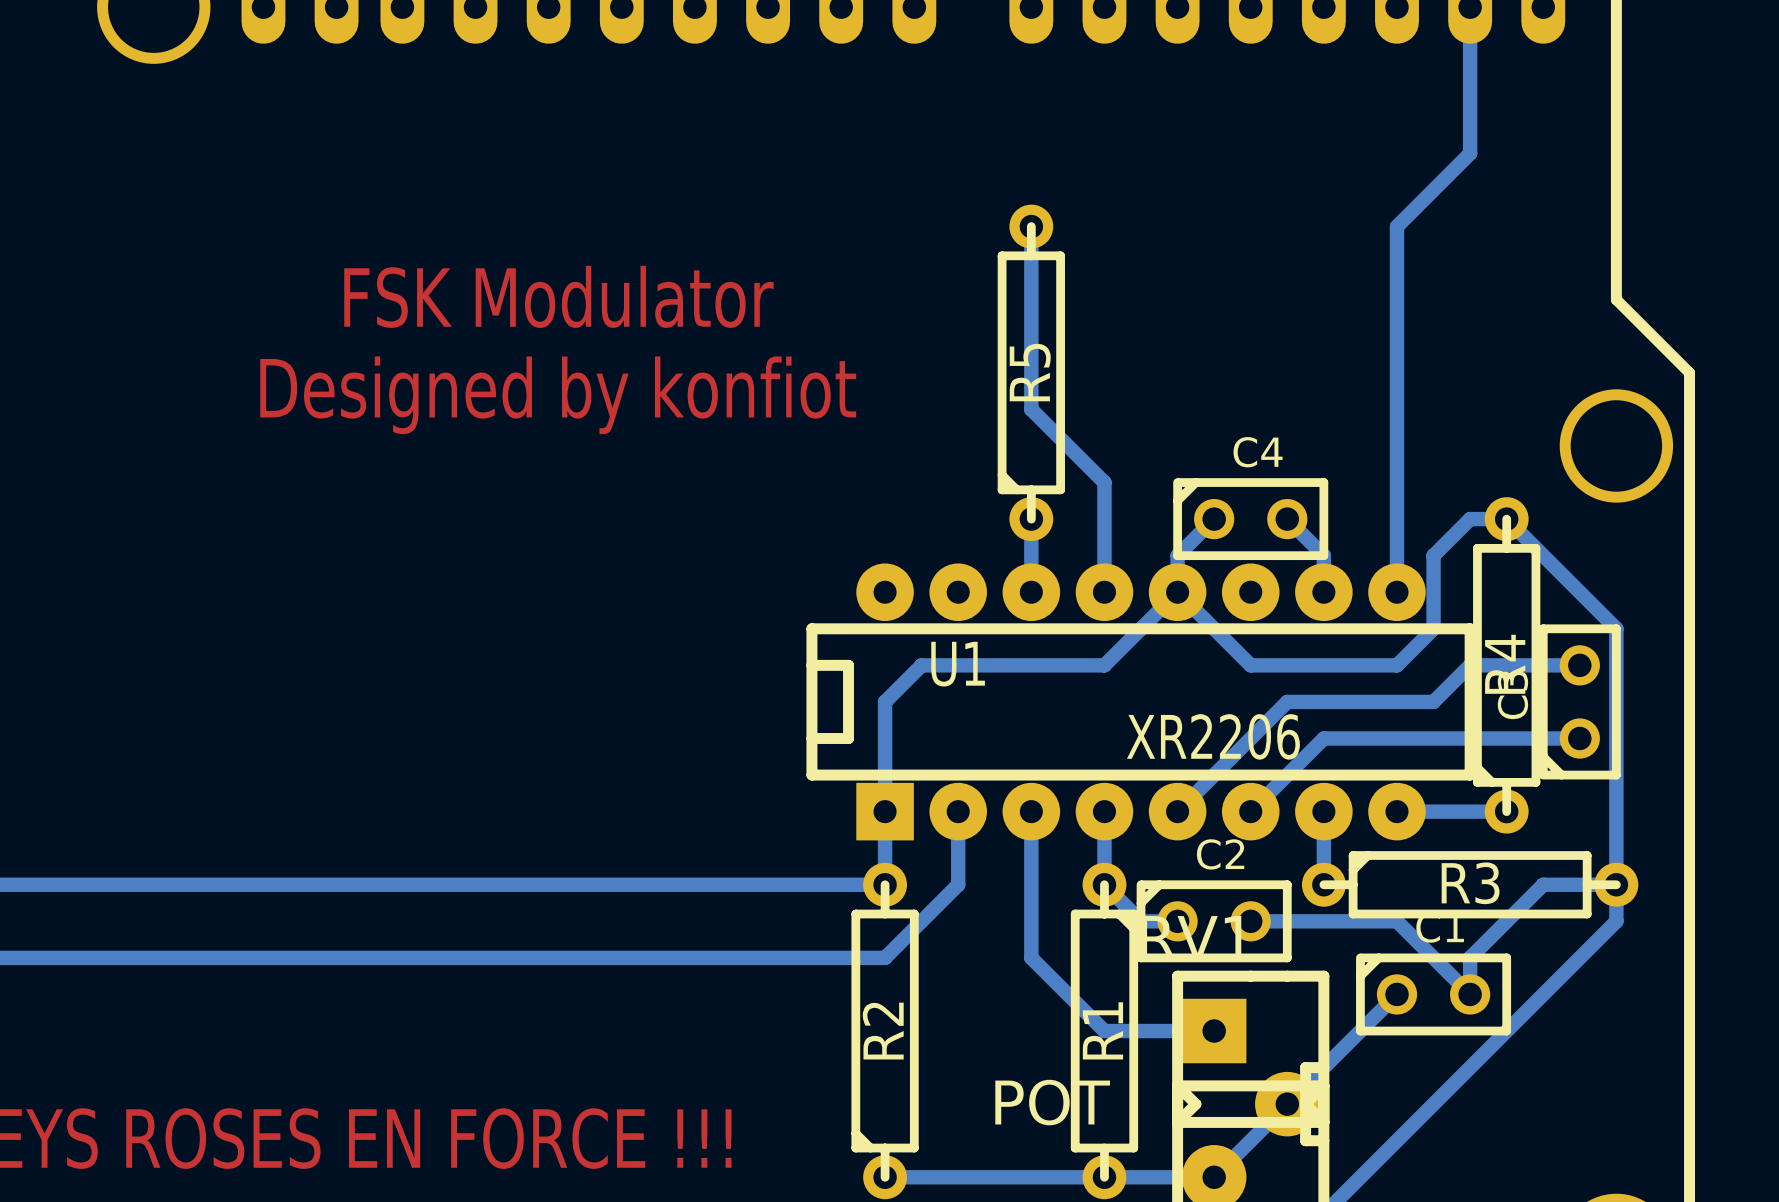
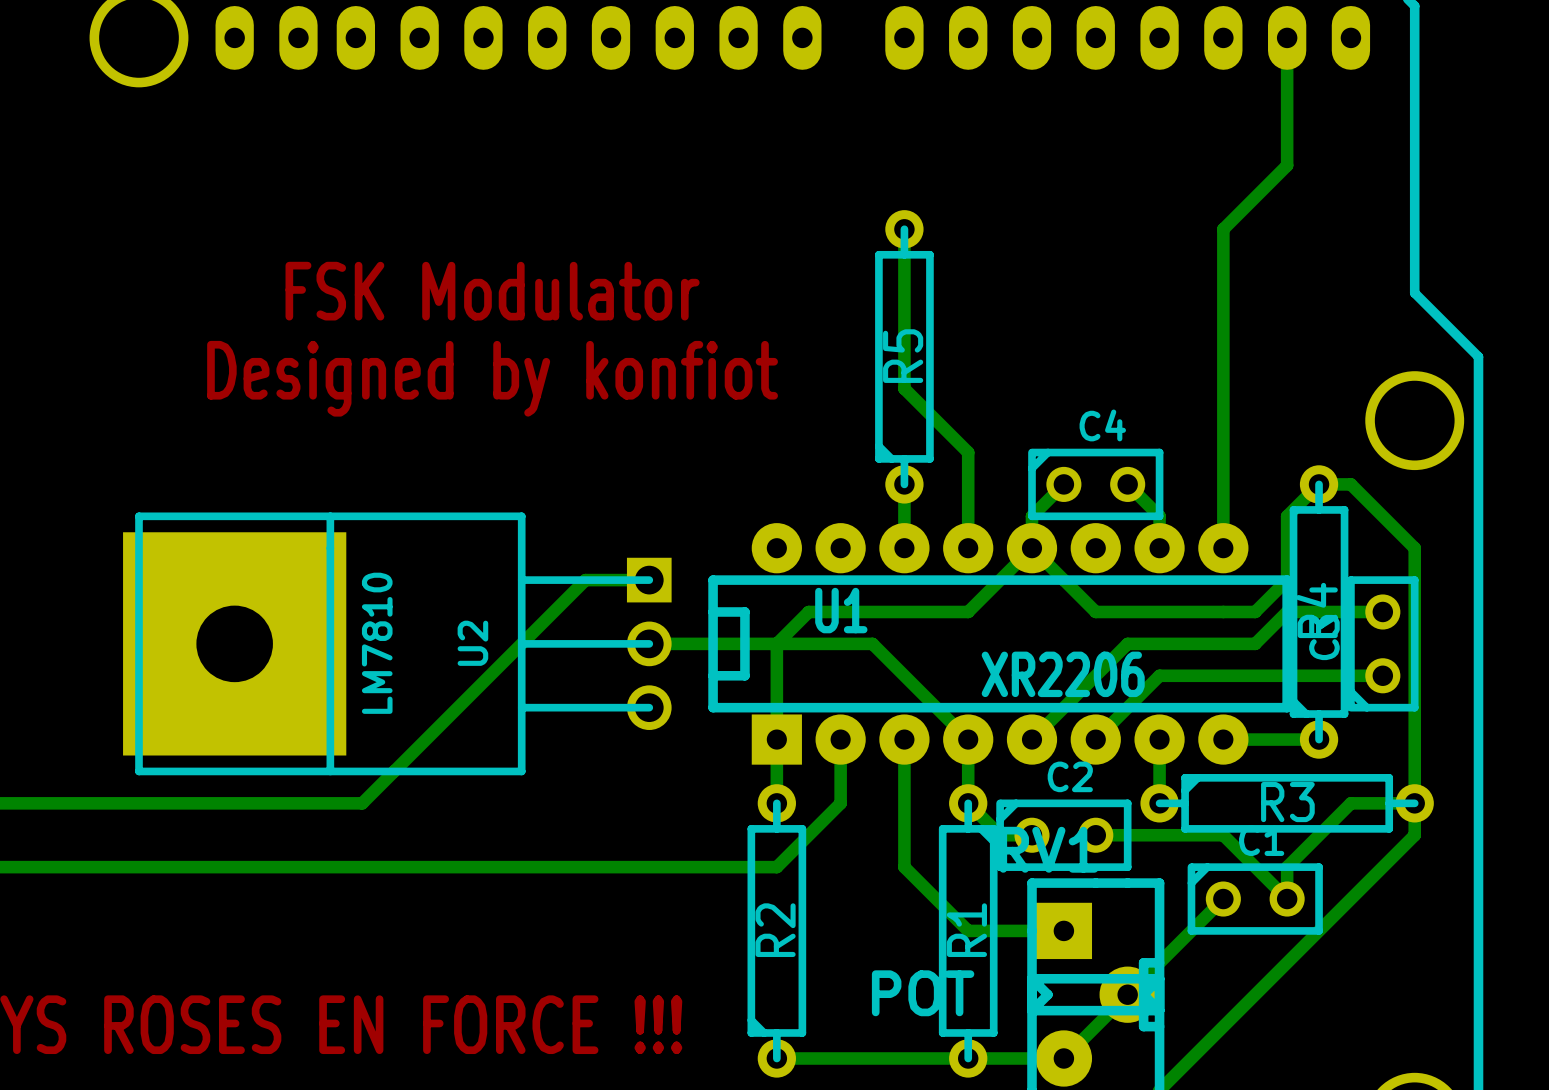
bottom track: (1616, 628) (1506, 519) (1470, 519) (1433, 555) (1433, 628) (1397, 665) -> (1414, 580) (1414, 548) (1350, 484) (1319, 484) (1287, 516) (1287, 580) (1255, 611) (1223, 611)
U2: none -> LM7810 (397, 643)
bottom track: none -> (649, 643) (872, 643) (968, 739)
bottom track: (409, 884) (885, 884) -> (362, 803) (585, 580) (649, 580)

